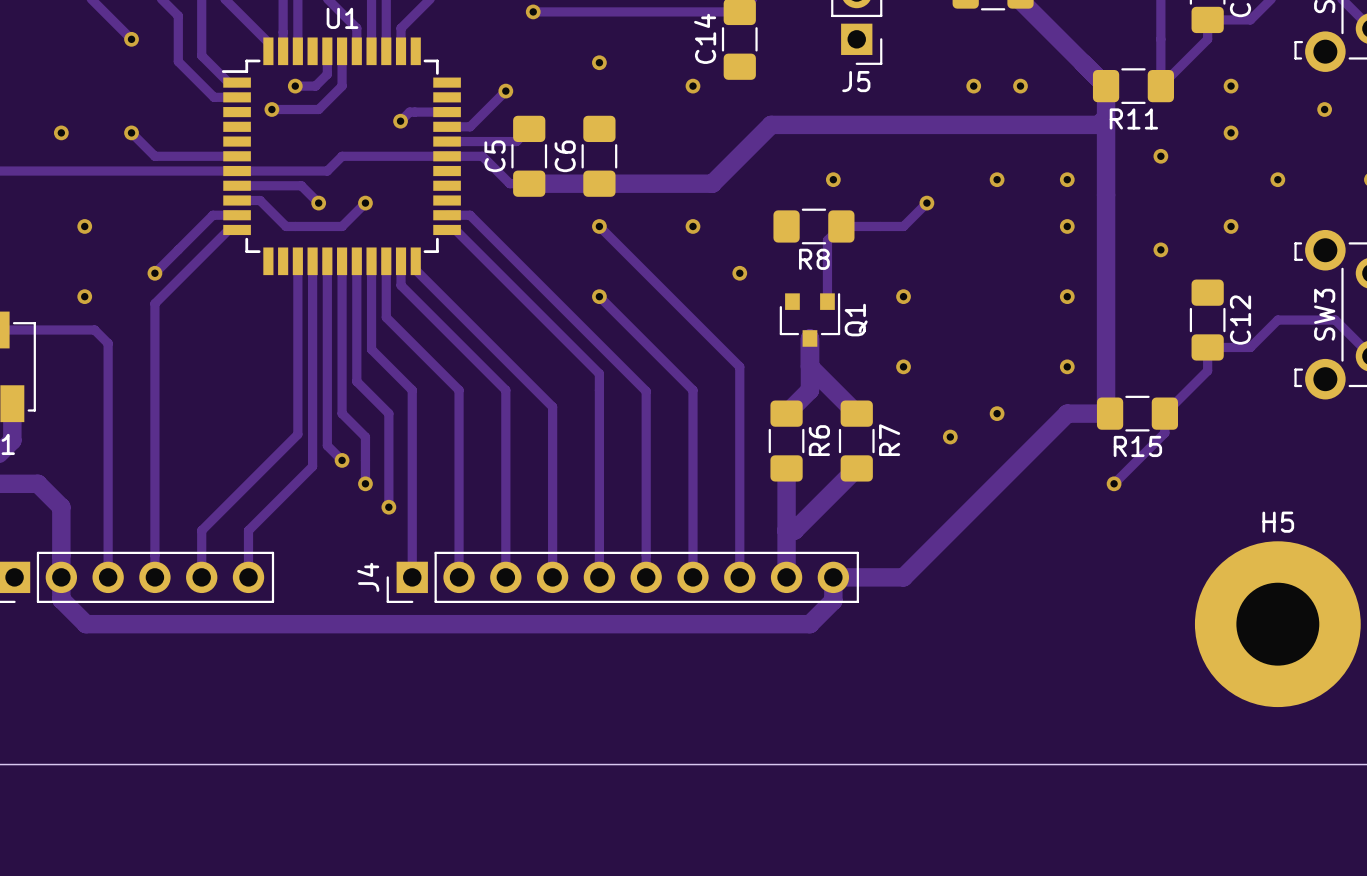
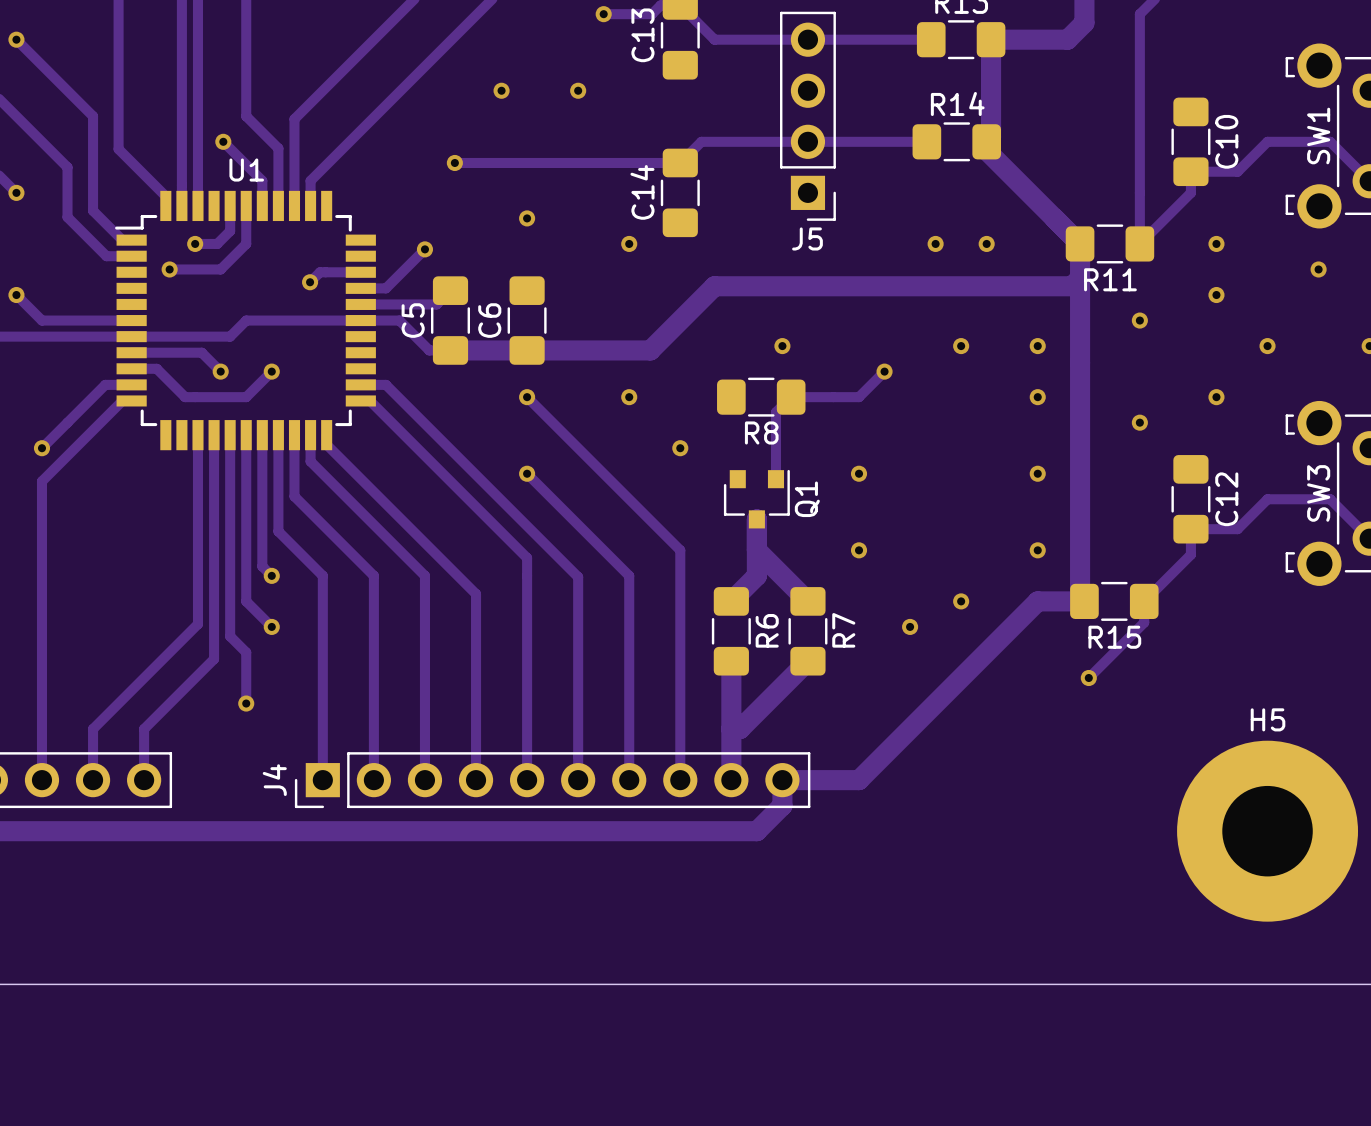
track: (365, 390) (388, 413) (388, 507) -> none
via: none -> (271, 575)
track: (365, 437) (365, 483) -> (246, 652) (246, 703)
via: none -> (271, 626)
via: (342, 460) -> none
via: (365, 483) -> none
via: none -> (246, 703)
via: (388, 507) -> none

